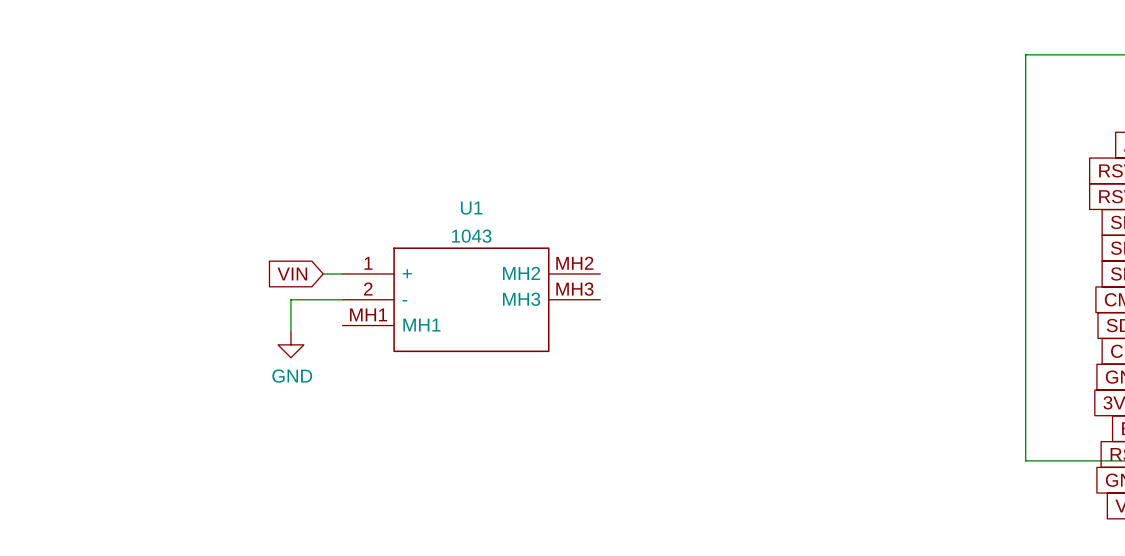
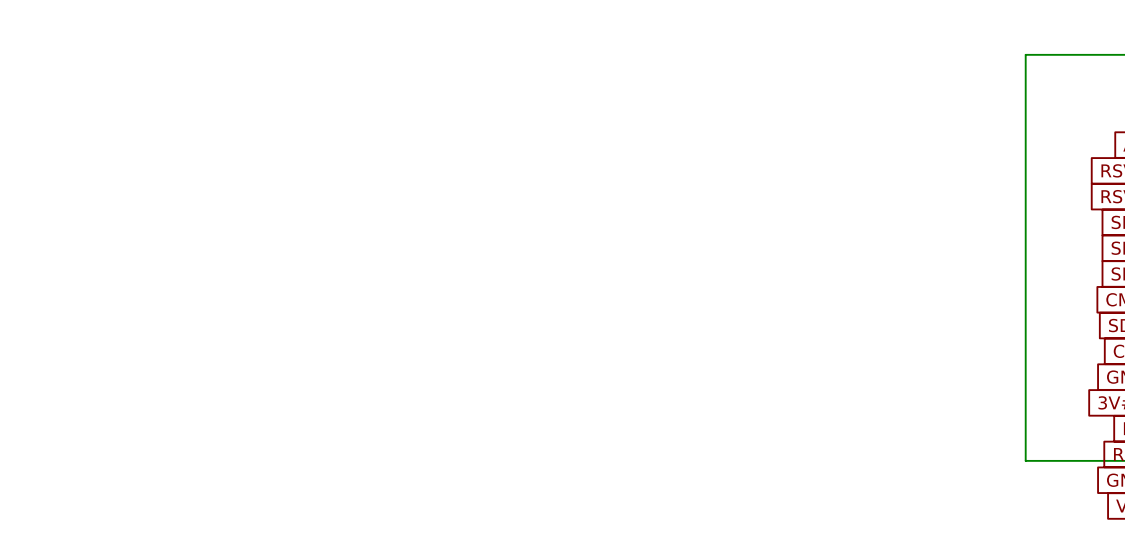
global label: VIN (292, 273) -> none
wire: (323, 273) (342, 273) -> none
wire: (342, 299) (290, 299) (290, 331) -> none
U1: 1043 (471, 299) -> none
power symbol: GND (290, 344) -> none

